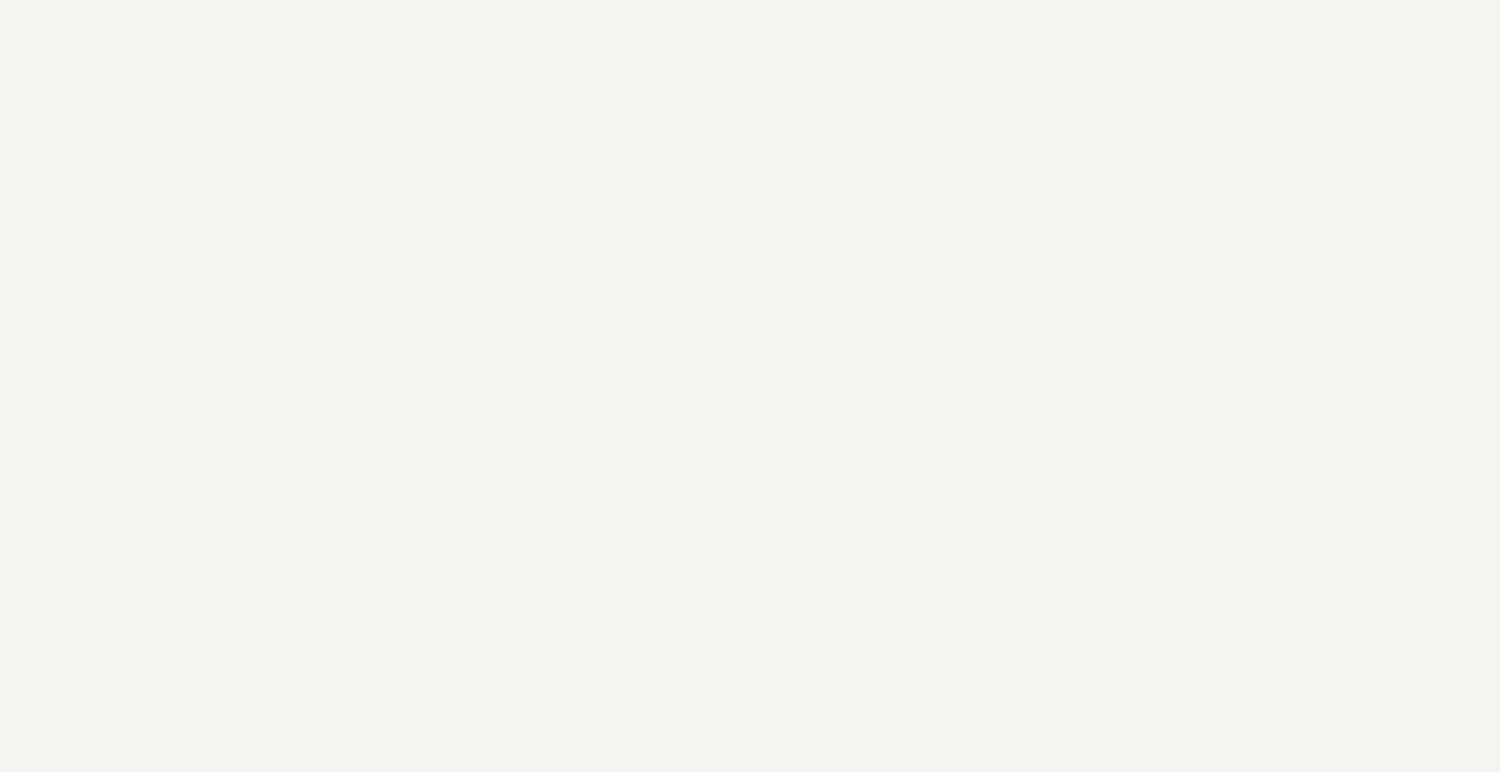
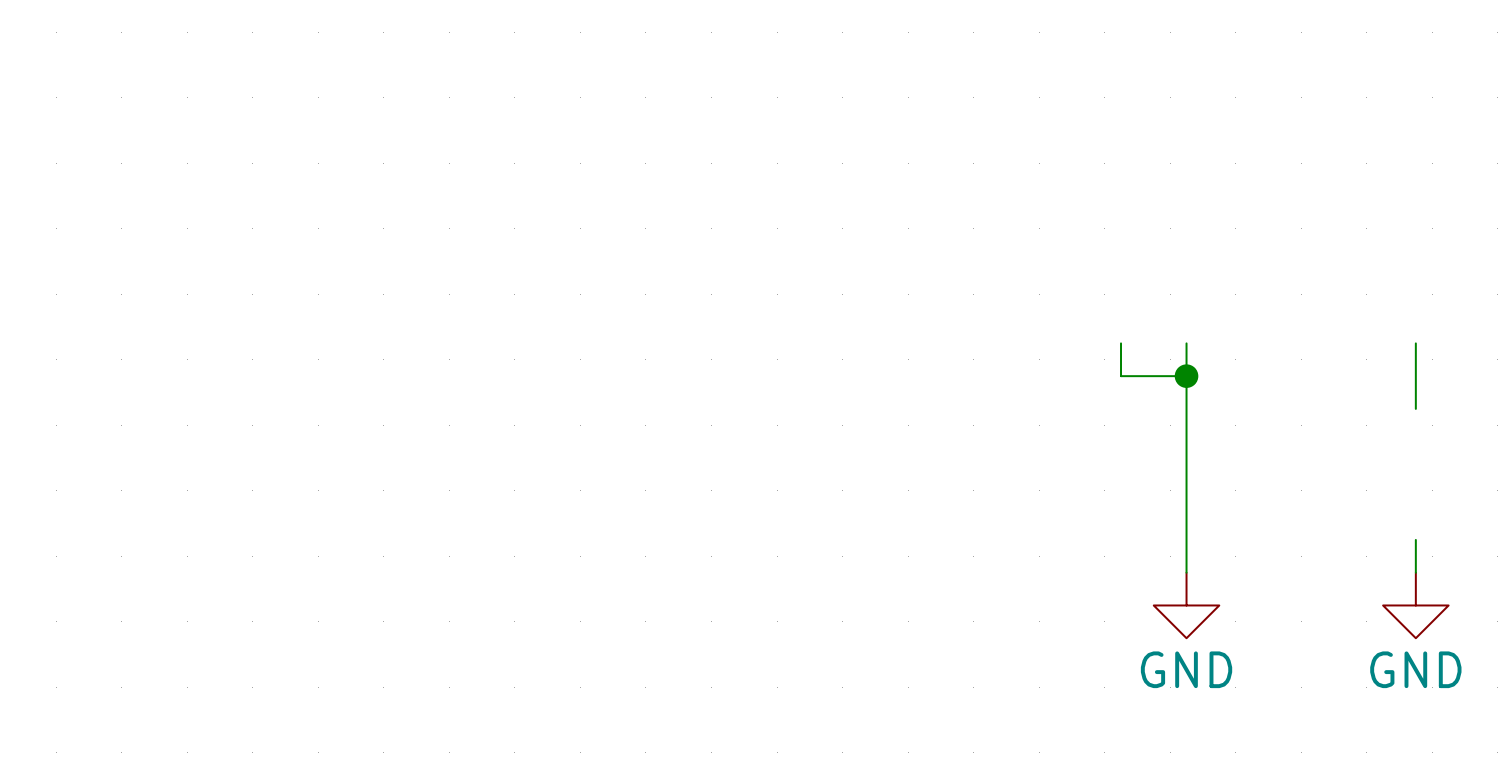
wire: none -> (1121, 343) (1121, 376) (1186, 376)
wire: none -> (1186, 343) (1186, 572)
wire: none -> (1415, 343) (1415, 408)
junction: none -> (1186, 376)
wire: none -> (1415, 539) (1415, 572)
power symbol: none -> GND (1186, 605)
power symbol: none -> GND (1415, 605)

